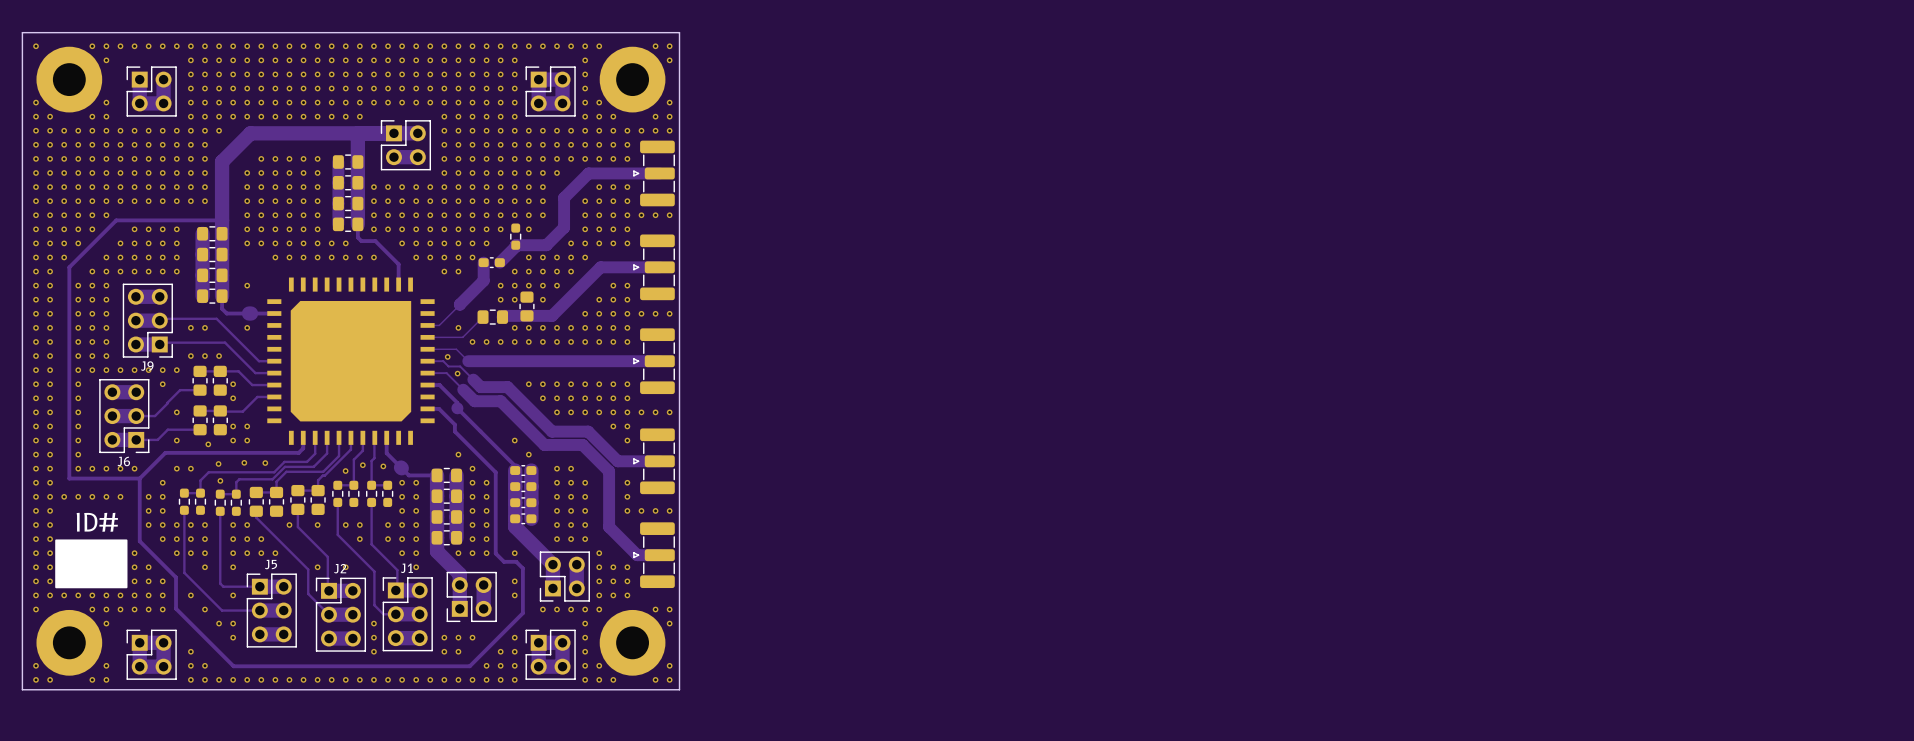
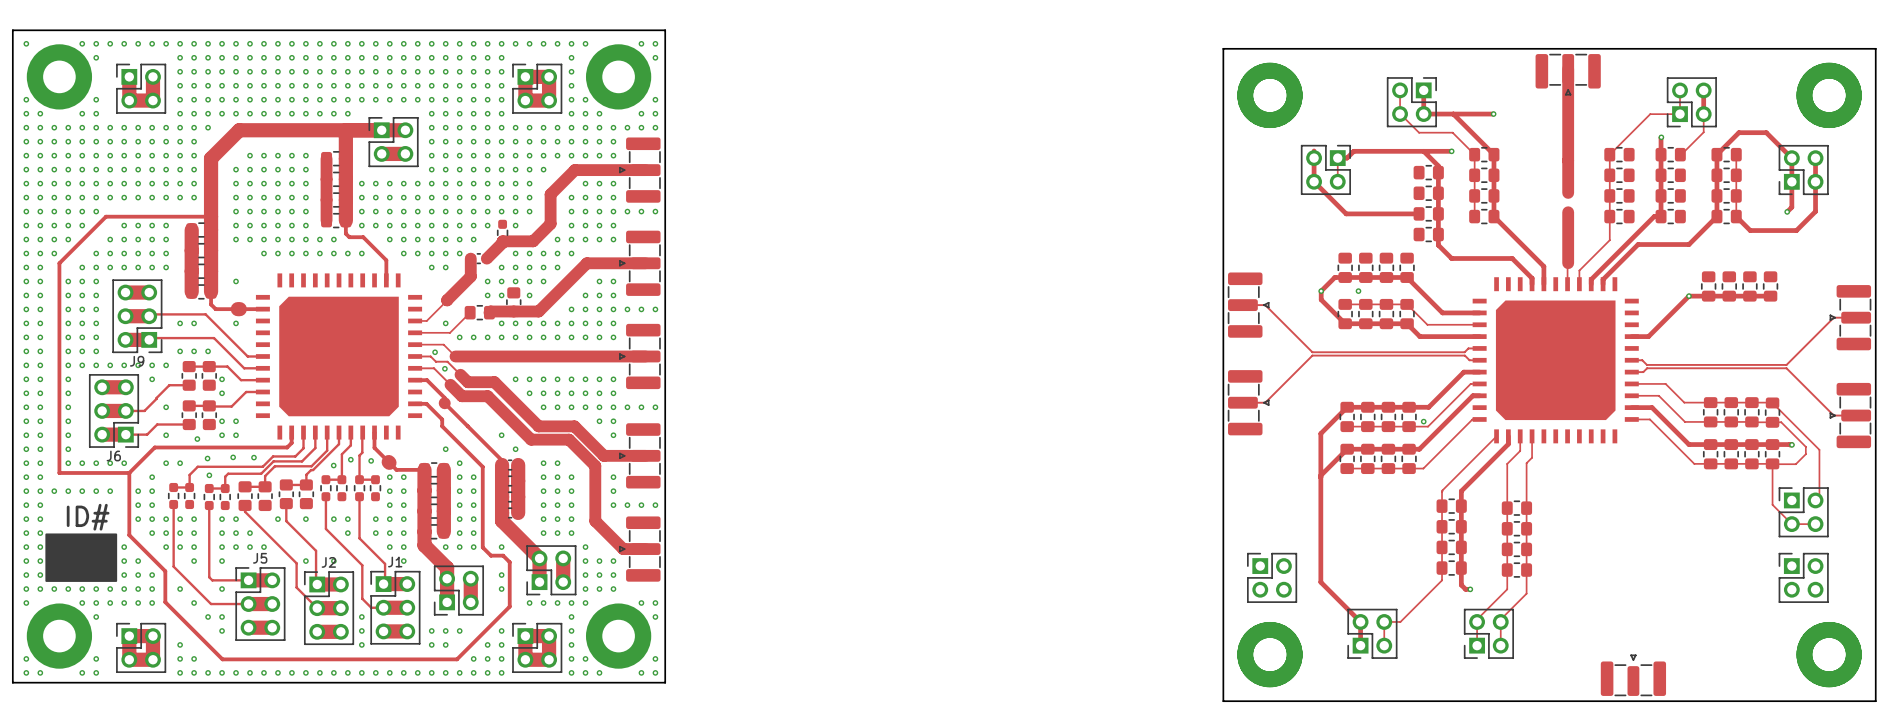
board edge: none -> (1223, 48) (1875, 48) (1875, 701) (1223, 701) (1223, 48)
track: none -> (1568, 68) (1568, 192)
part: none -> (1568, 74)
track: none -> (1400, 90) (1400, 114) (1419, 132) (1452, 132) (1474, 154) (1474, 216)
track: none -> (1423, 90) (1423, 114) (1493, 114)
track: none -> (1680, 90) (1680, 114) (1650, 114) (1609, 154) (1609, 240) (1579, 270) (1579, 284)
track: none -> (1703, 90) (1703, 132) (1680, 154)
part: none -> (1269, 95)
part: none -> (1829, 95)
part: none -> (1411, 102)
part: none -> (1691, 102)
track: none -> (1453, 114) (1493, 154) (1493, 216) (1543, 266) (1543, 284)
via: none -> (1493, 114)
track: none -> (1661, 137) (1661, 216) (1654, 216) (1591, 279) (1591, 284)
via: none -> (1661, 137)
track: none -> (1314, 150) (1314, 181) (1346, 213) (1419, 213)
track: none -> (1423, 151) (1438, 166) (1438, 245) (1451, 258) (1512, 258) (1532, 278) (1532, 284)
track: none -> (1451, 151) (1353, 151) (1347, 158) (1337, 158) (1337, 181)
via: none -> (1451, 151)
part: none -> (1484, 154)
part: none -> (1619, 154)
part: none -> (1670, 154)
part: none -> (1726, 154)
track: none -> (1736, 154) (1736, 216) (1750, 230) (1796, 230) (1815, 211) (1815, 158)
part: none -> (1325, 169)
part: none -> (1803, 170)
part: none -> (1428, 172)
part: none -> (1484, 175)
part: none -> (1619, 175)
part: none -> (1670, 175)
part: none -> (1726, 175)
part: none -> (1428, 193)
part: none -> (1484, 195)
part: none -> (1619, 195)
part: none -> (1670, 195)
part: none -> (1726, 195)
track: none -> (1568, 212) (1567, 284)
track: none -> (1787, 211) (1791, 207) (1791, 158) (1766, 132) (1738, 132) (1716, 154) (1716, 216) (1688, 244) (1638, 244) (1603, 279) (1603, 284)
via: none -> (1787, 211)
part: none -> (1428, 213)
part: none -> (1484, 216)
part: none -> (1619, 216)
part: none -> (1670, 216)
part: none -> (1726, 216)
part: none -> (1428, 234)
part: none -> (1345, 267)
part: none -> (1365, 267)
part: none -> (1386, 267)
part: none -> (1407, 267)
part: none -> (1708, 286)
part: none -> (1729, 286)
part: none -> (1749, 286)
part: none -> (1770, 286)
via: none -> (1321, 291)
via: none -> (1358, 291)
via: none -> (1688, 296)
track: none -> (1770, 296) (1688, 296) (1648, 336) (1631, 336)
track: none -> (1345, 304) (1407, 304) (1427, 324) (1479, 324)
track: none -> (1242, 305) (1265, 305) (1312, 352) (1464, 352) (1468, 348) (1479, 348)
part: none -> (1248, 305)
track: none -> (1479, 312) (1442, 312) (1407, 277) (1334, 277) (1321, 291) (1321, 299) (1345, 323) (1407, 323) (1419, 336) (1479, 336)
part: none -> (1345, 314)
part: none -> (1365, 314)
part: none -> (1386, 314)
part: none -> (1407, 314)
part: none -> (1850, 317)
track: none -> (1856, 317) (1833, 317) (1786, 364) (1646, 364) (1642, 360) (1631, 360)
track: none -> (1479, 360) (1469, 360) (1464, 355) (1312, 355) (1265, 402) (1242, 402)
part: none -> (1555, 360)
track: none -> (1479, 372) (1463, 372) (1428, 407) (1347, 407) (1320, 433) (1320, 582) (1360, 621) (1360, 645)
track: none -> (1631, 372) (1643, 372) (1647, 368) (1786, 368) (1833, 415) (1856, 415)
track: none -> (1479, 383) (1470, 383) (1428, 426) (1347, 426)
track: none -> (1631, 383) (1665, 383) (1684, 402) (1772, 402) (1819, 449) (1819, 500)
track: none -> (1479, 395) (1472, 395) (1419, 449) (1347, 449) (1320, 475)
track: none -> (1631, 395) (1658, 395) (1685, 421) (1781, 422) (1805, 446) (1805, 454) (1795, 464) (1772, 463)
part: none -> (1248, 402)
track: none -> (1631, 407) (1652, 407) (1688, 444) (1791, 444) (1791, 444) (1789, 444) (1789, 444)
part: none -> (1710, 412)
part: none -> (1731, 412)
part: none -> (1751, 412)
part: none -> (1772, 412)
part: none -> (1850, 415)
part: none -> (1347, 416)
part: none -> (1367, 416)
part: none -> (1388, 416)
part: none -> (1409, 416)
track: none -> (1479, 419) (1472, 419) (1423, 468) (1347, 468)
track: none -> (1631, 419) (1649, 419) (1694, 463) (1772, 463)
via: none -> (1423, 421)
track: none -> (1496, 436) (1442, 490) (1442, 580) (1400, 621) (1384, 621) (1384, 645)
track: none -> (1508, 436) (1508, 444) (1461, 491) (1461, 585) (1465, 589) (1470, 589)
track: none -> (1520, 436) (1520, 450) (1507, 463) (1507, 589) (1477, 619) (1477, 643)
track: none -> (1532, 436) (1532, 457) (1526, 463) (1526, 593) (1500, 619) (1500, 643)
via: none -> (1791, 444)
part: none -> (1710, 454)
part: none -> (1731, 454)
part: none -> (1751, 454)
part: none -> (1772, 454)
part: none -> (1347, 458)
part: none -> (1367, 458)
part: none -> (1388, 458)
part: none -> (1409, 458)
track: none -> (1772, 463) (1772, 504) (1791, 524) (1815, 524)
part: none -> (1451, 506)
part: none -> (1516, 508)
part: none -> (1803, 512)
part: none -> (1451, 526)
part: none -> (1516, 528)
part: none -> (1451, 547)
part: none -> (1516, 549)
part: none -> (1451, 568)
part: none -> (1516, 570)
part: none -> (1272, 577)
part: none -> (1803, 577)
via: none -> (1470, 589)
part: none -> (1372, 633)
part: none -> (1488, 633)
part: none -> (1269, 654)
part: none -> (1829, 654)
part: none -> (1633, 675)

